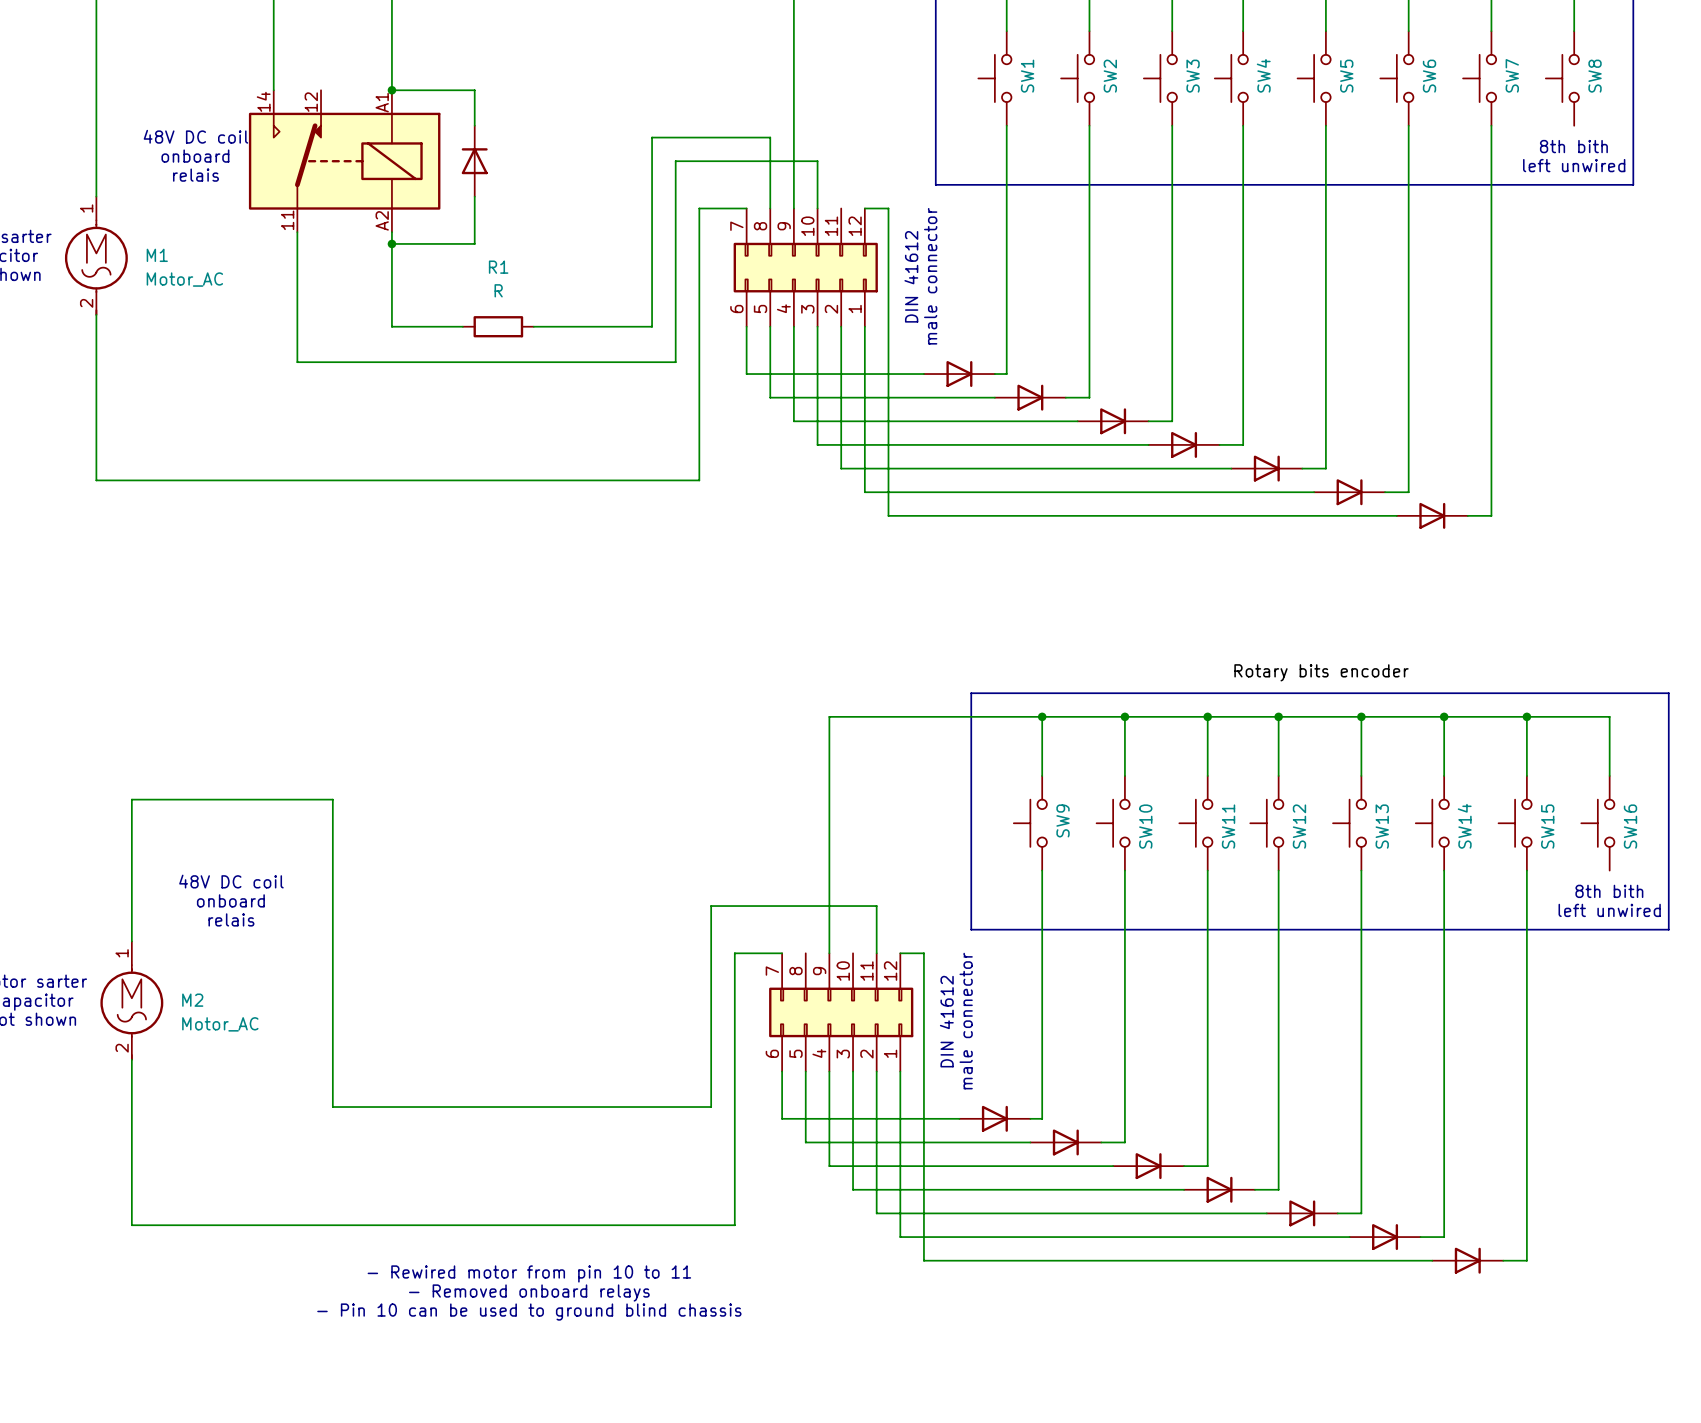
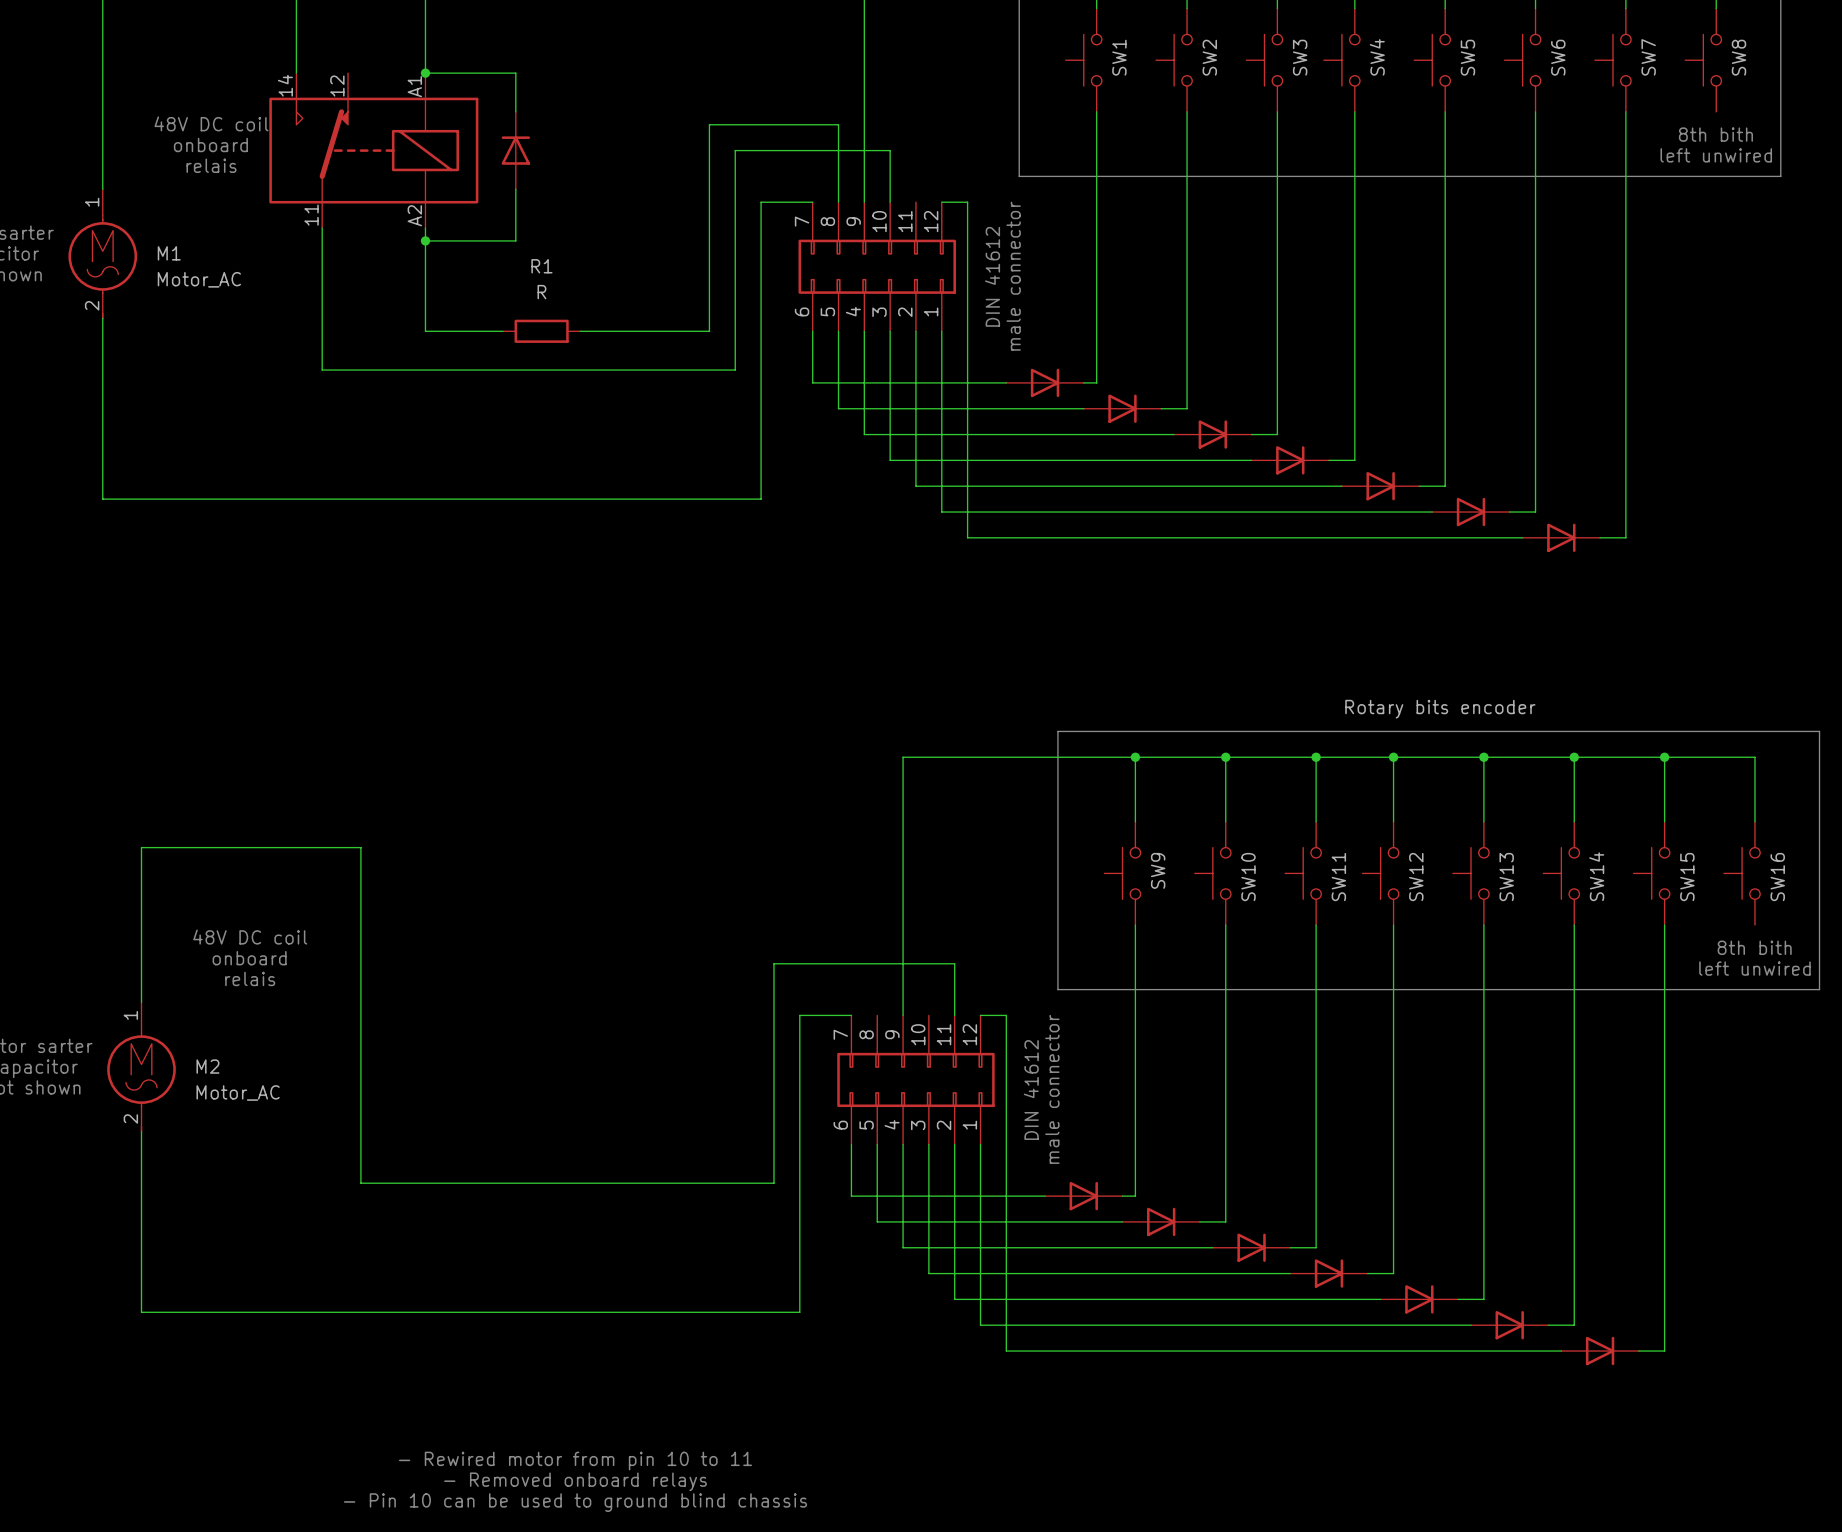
text position: - Rewired motor from pin 10 to 11 (529, 1273) -> - Rewired motor from pin 10 to 11 (575, 1461)
text position: - Removed onboard relays (529, 1293) -> - Removed onboard relays (575, 1481)
text position: - Pin 10 can be used to ground blind chassis (529, 1312) -> - Pin 10 can be used to ground blind chassis (575, 1502)

